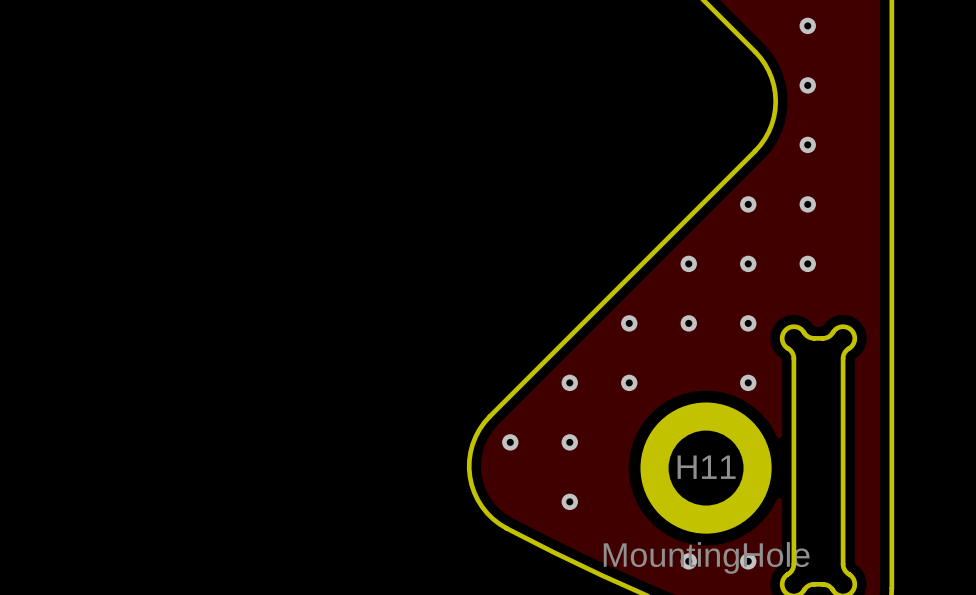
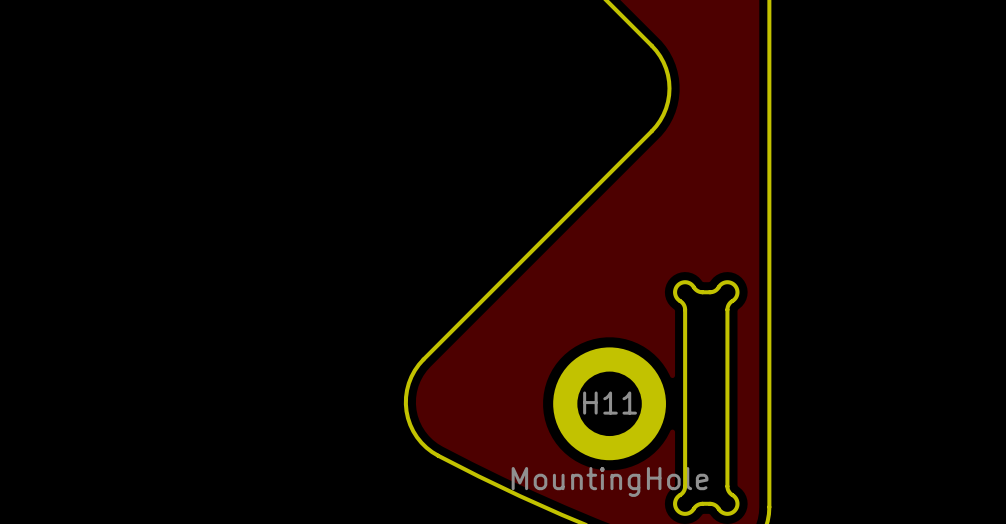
via: (807, 25) -> none
via: (807, 85) -> none
via: (807, 144) -> none
via: (748, 204) -> none
via: (807, 204) -> none
via: (688, 263) -> none
via: (748, 263) -> none
via: (807, 263) -> none
via: (629, 323) -> none
via: (688, 323) -> none
via: (748, 323) -> none
via: (569, 382) -> none
via: (629, 382) -> none
via: (748, 382) -> none
via: (510, 442) -> none
via: (569, 442) -> none
via: (569, 501) -> none
via: (688, 561) -> none
via: (748, 561) -> none

